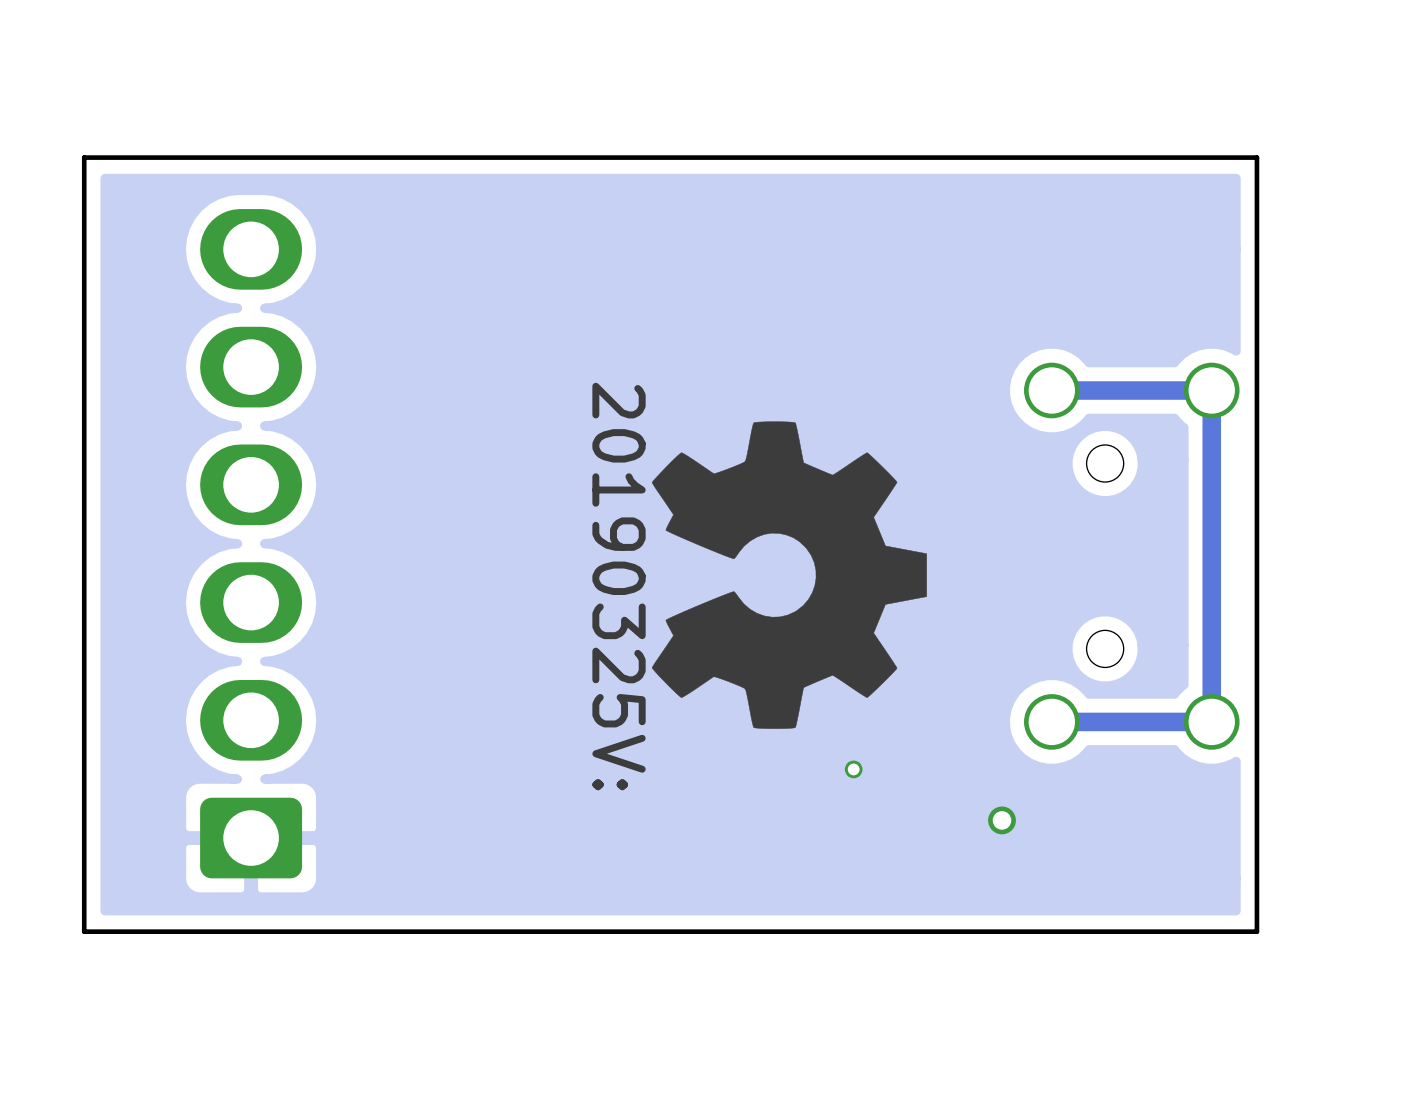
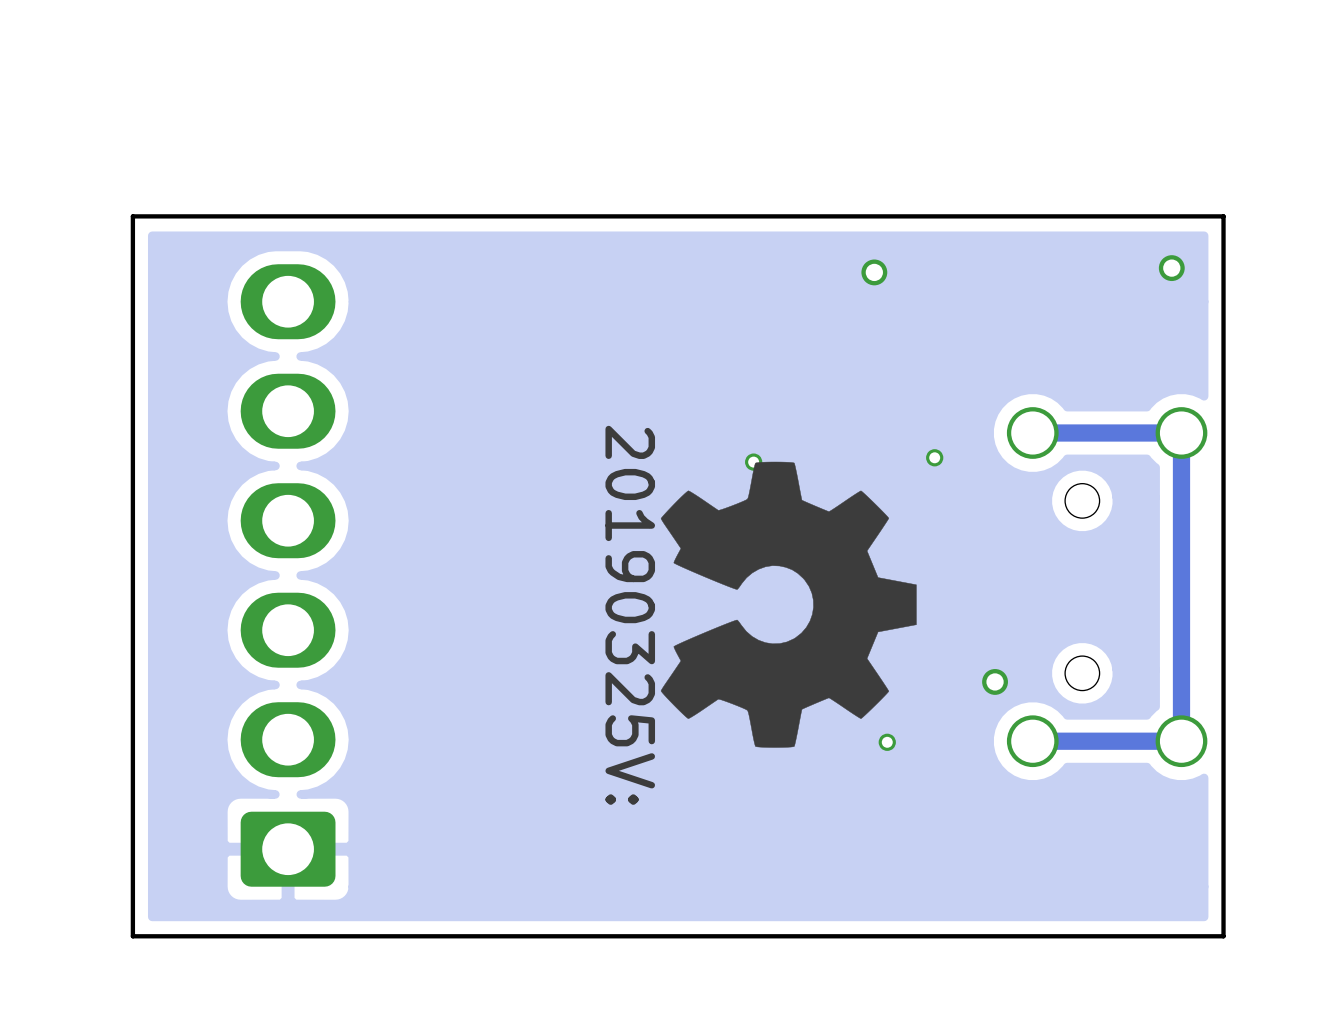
via: none -> (1171, 268)
via: none -> (874, 272)
via: none -> (934, 457)
via: none -> (753, 462)
via: none -> (887, 742)
via: (853, 769) -> none
via position: (1002, 820) -> (995, 681)

